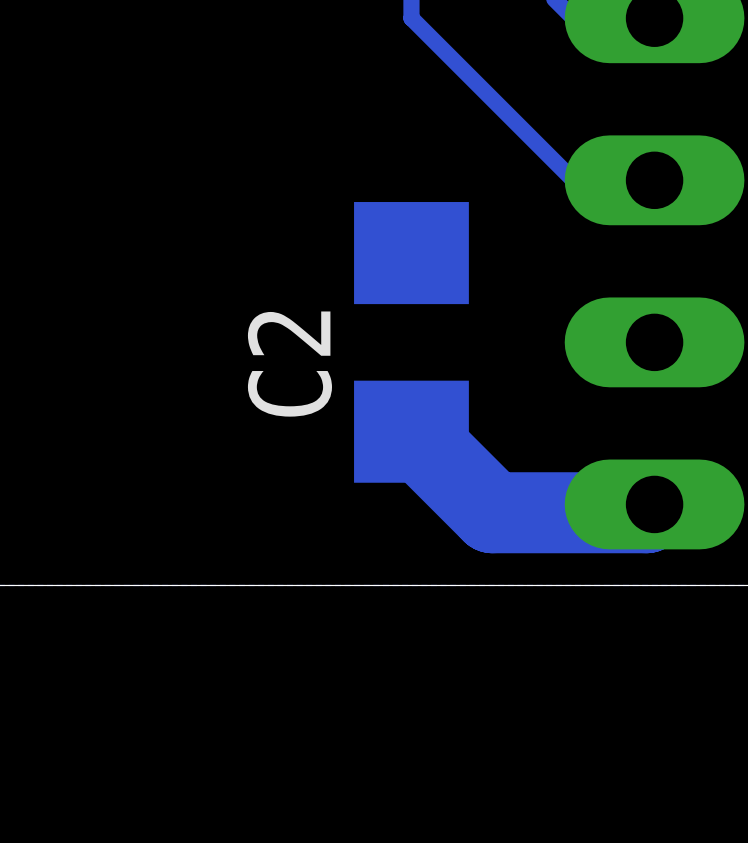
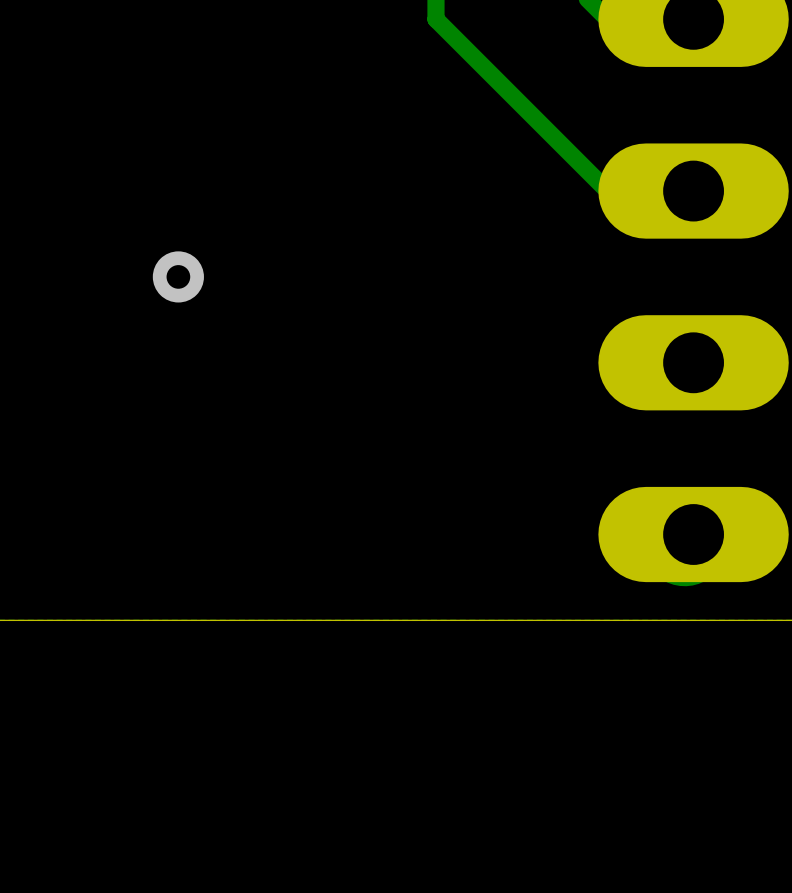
via: none -> (178, 276)
C2: (411, 342) -> none
track: (411, 431) (492, 512) (646, 512) -> none

